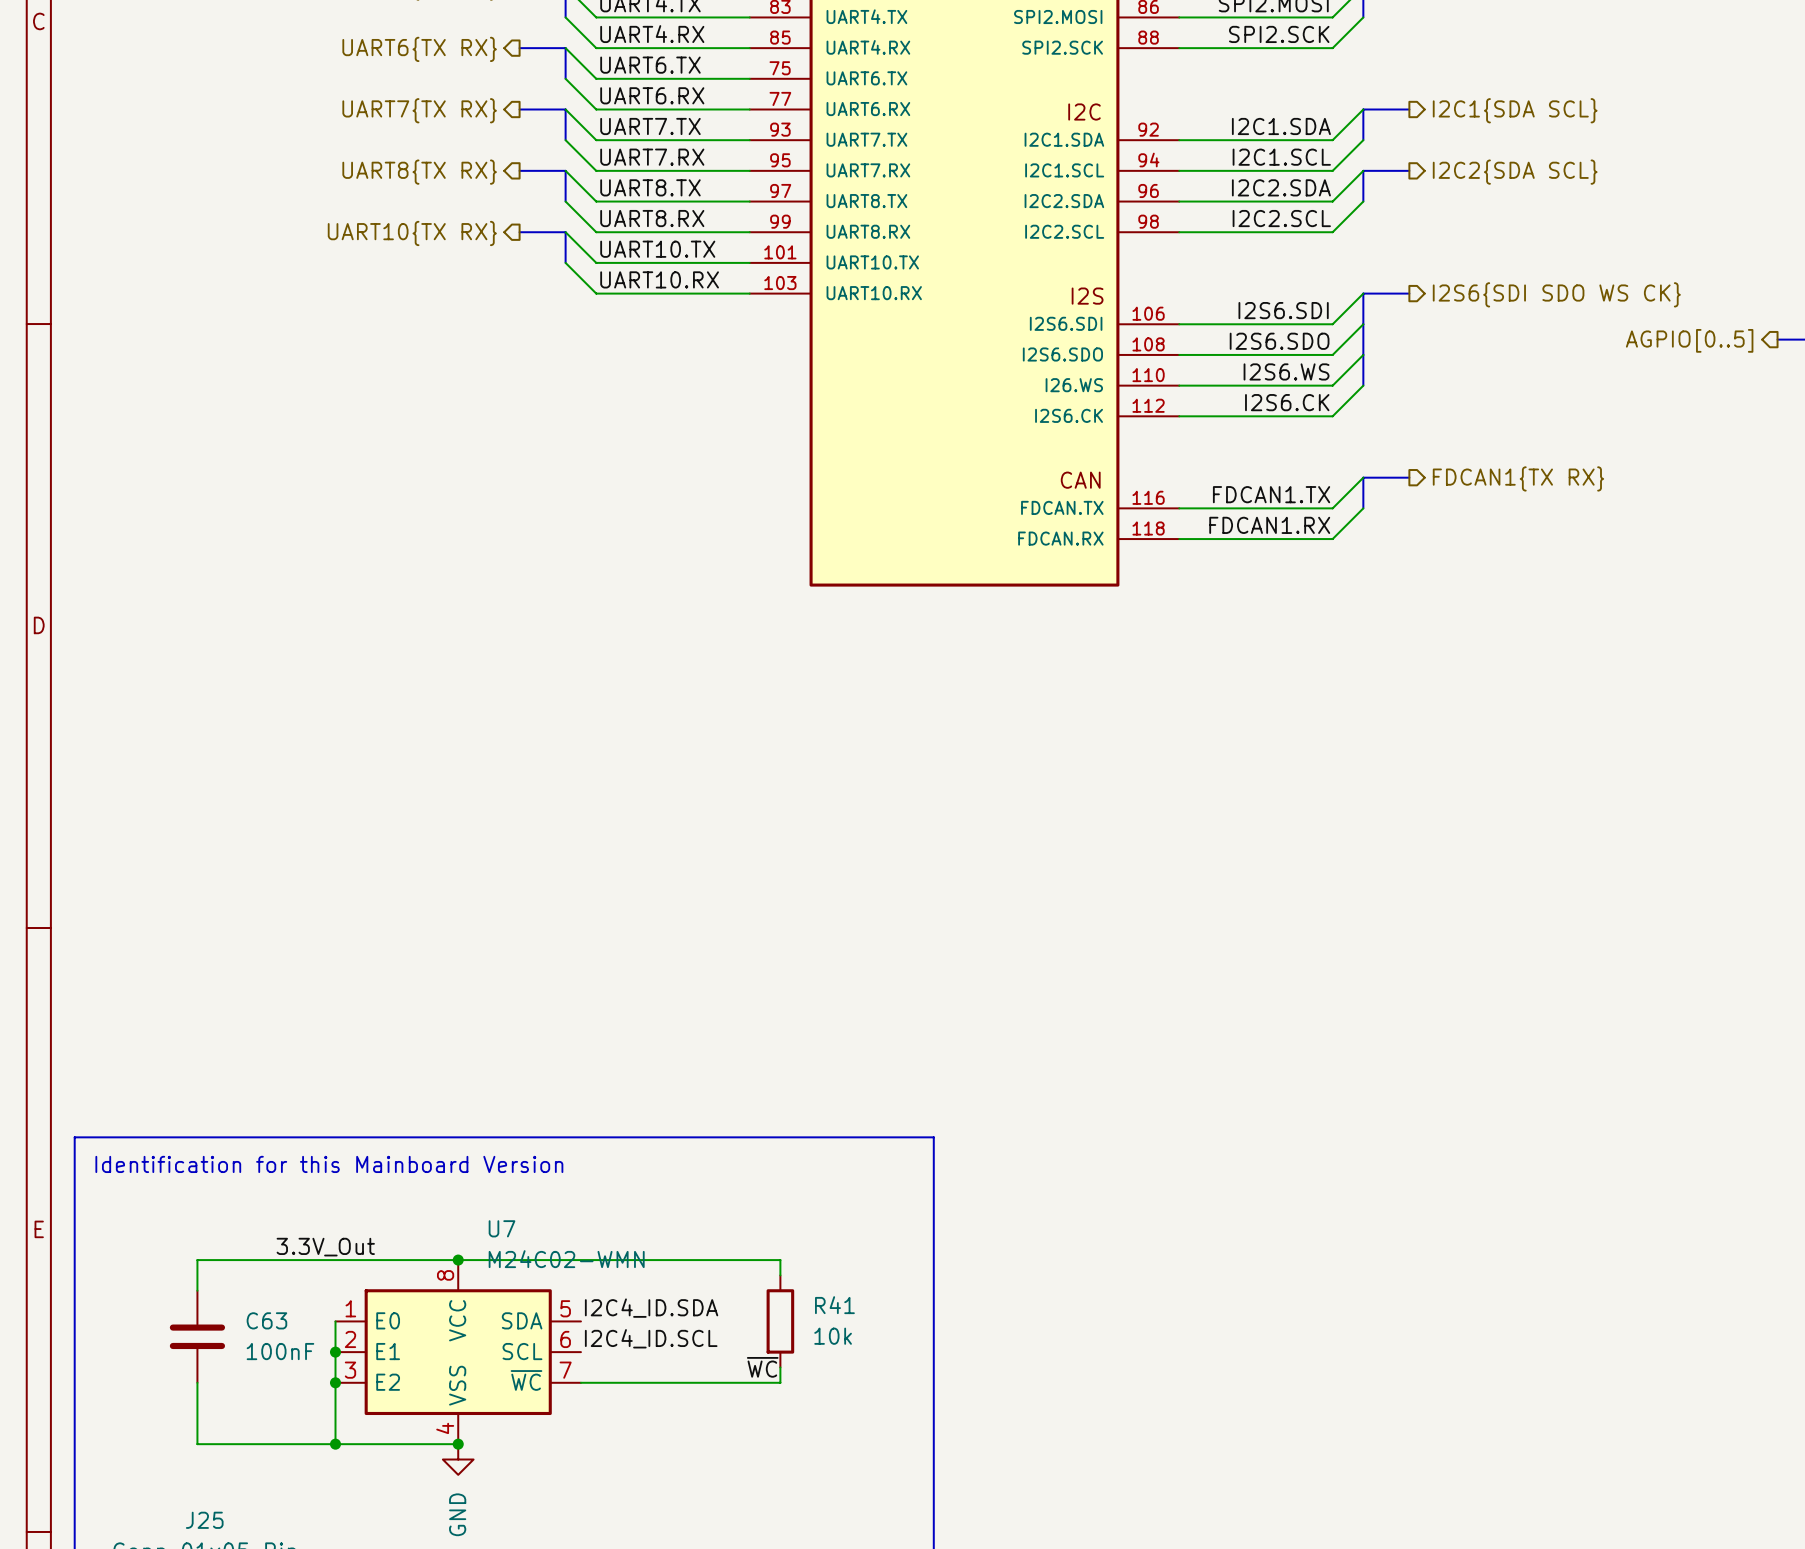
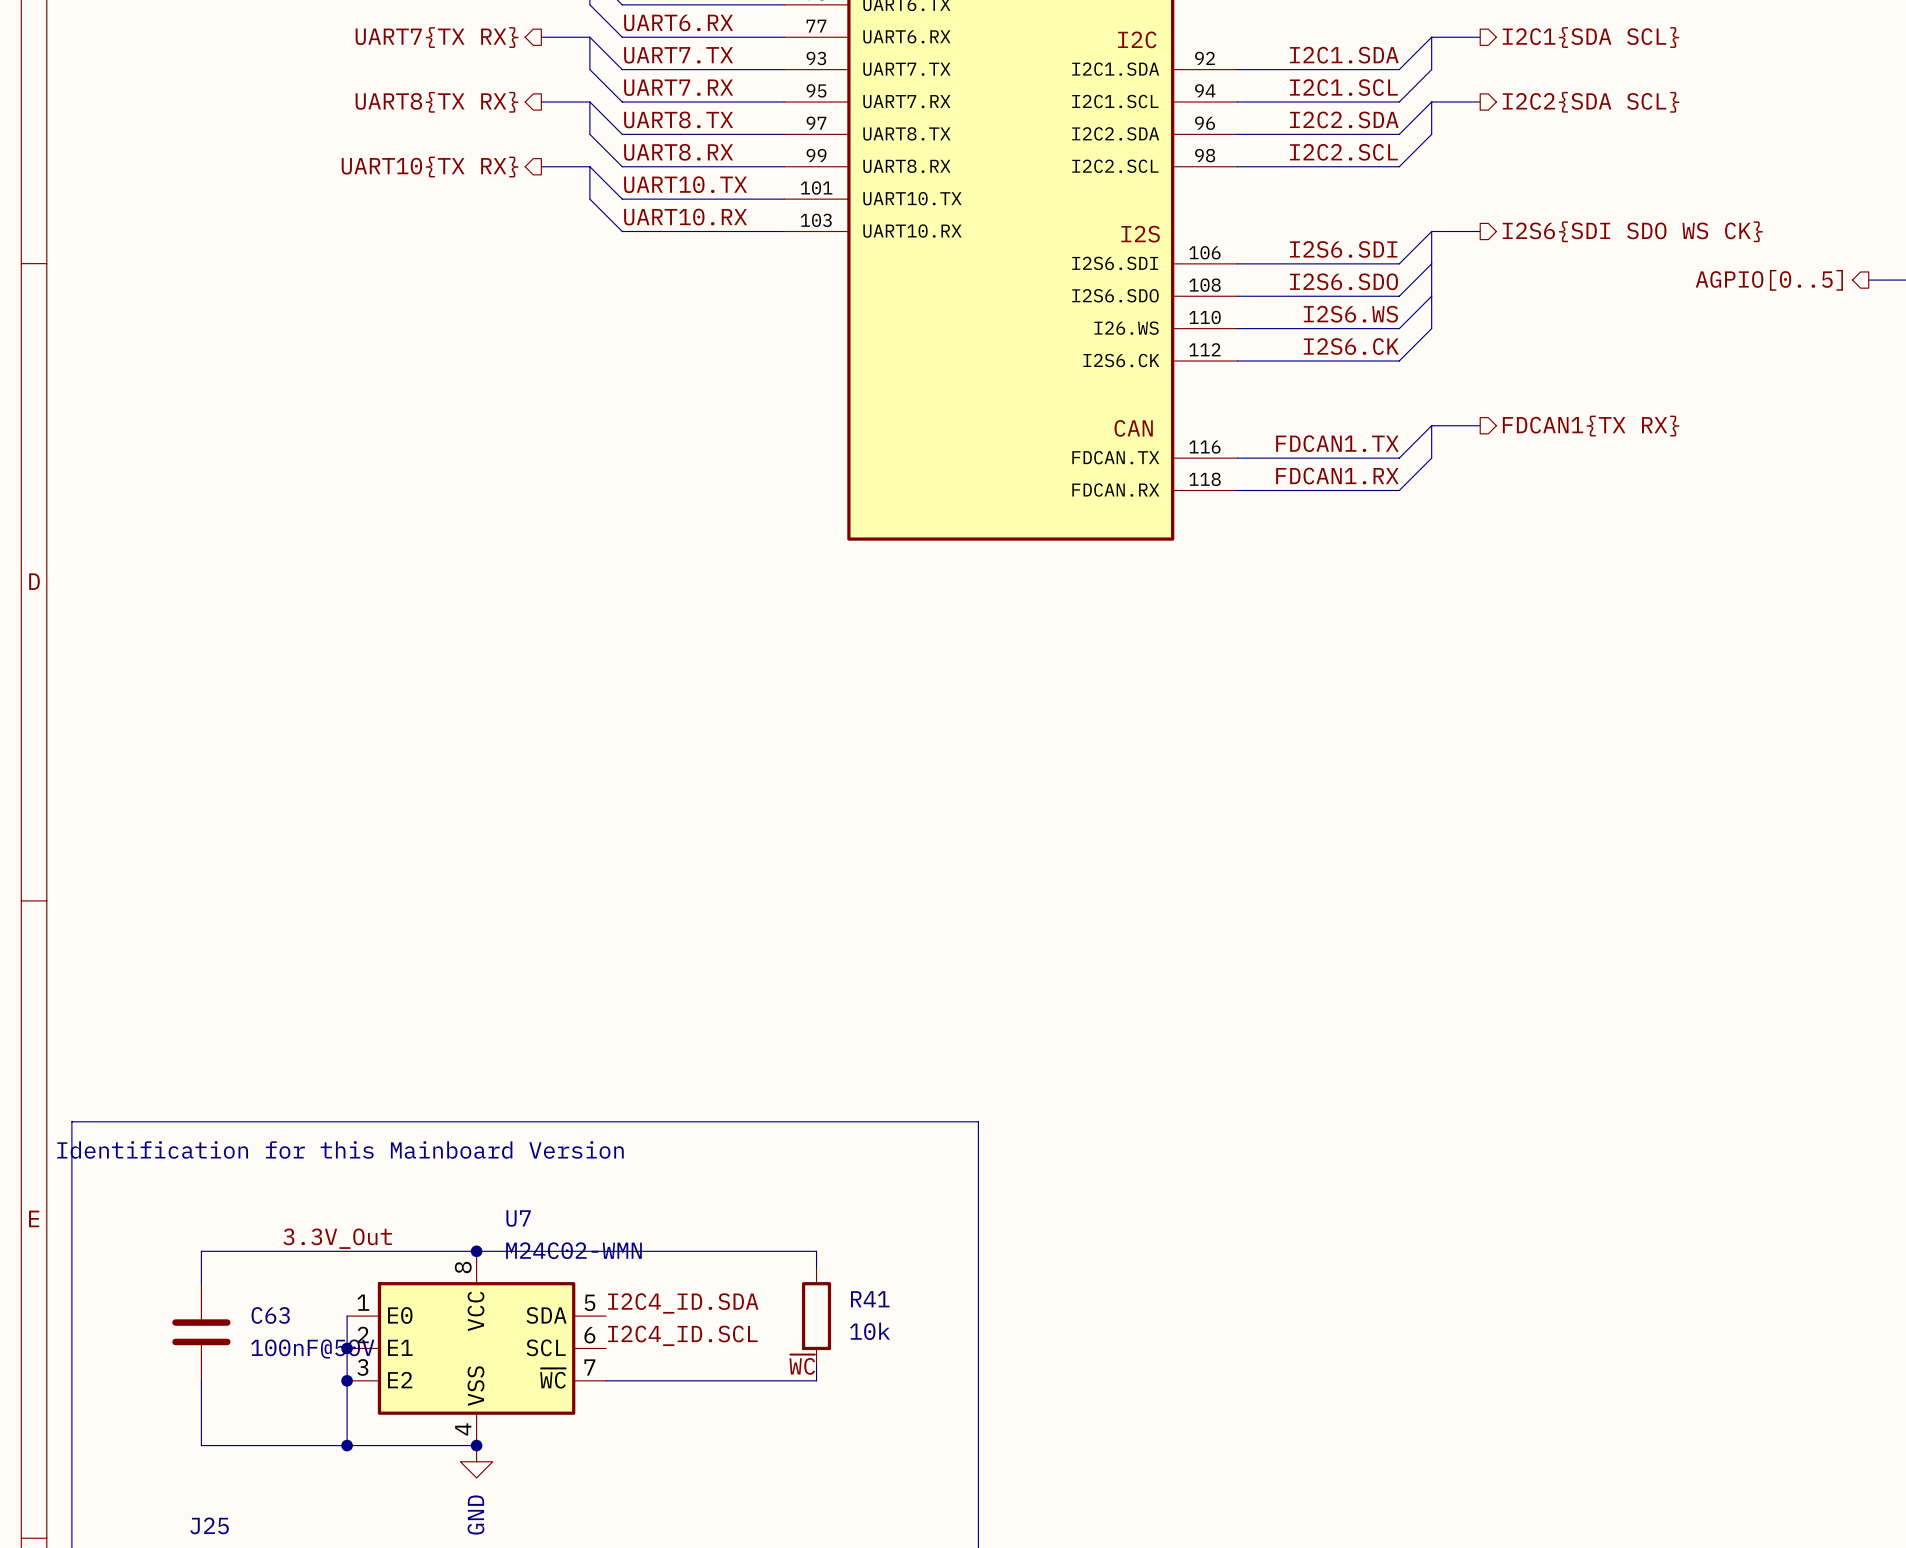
C63 value: 100nF (280, 1351) -> 100nF@50V (312, 1349)

